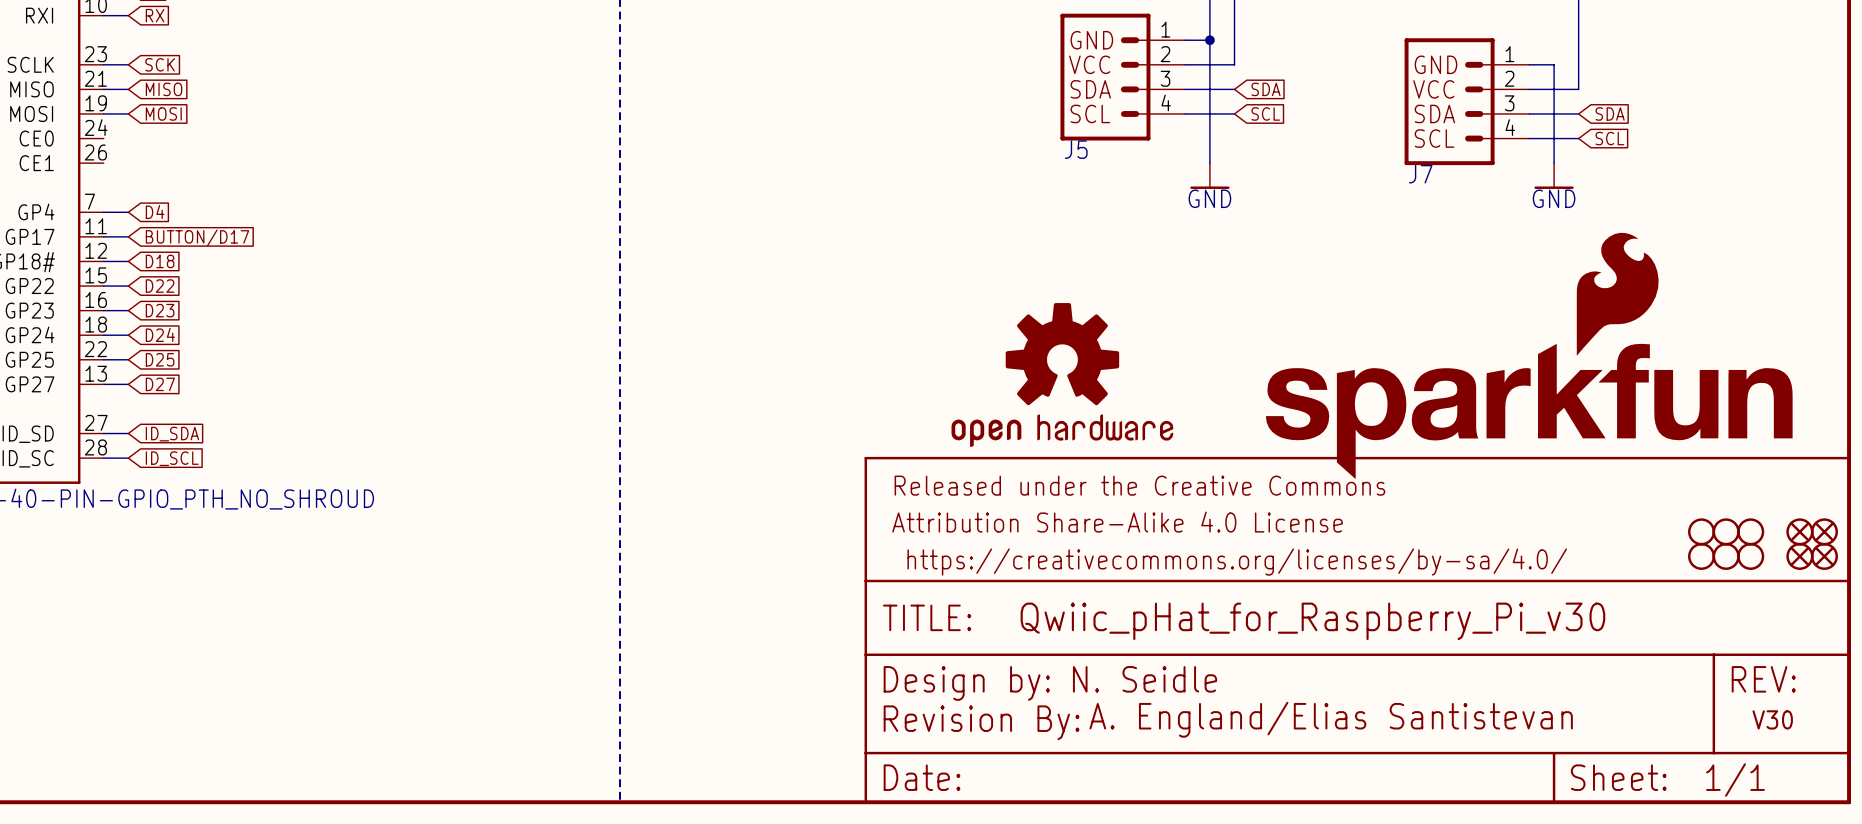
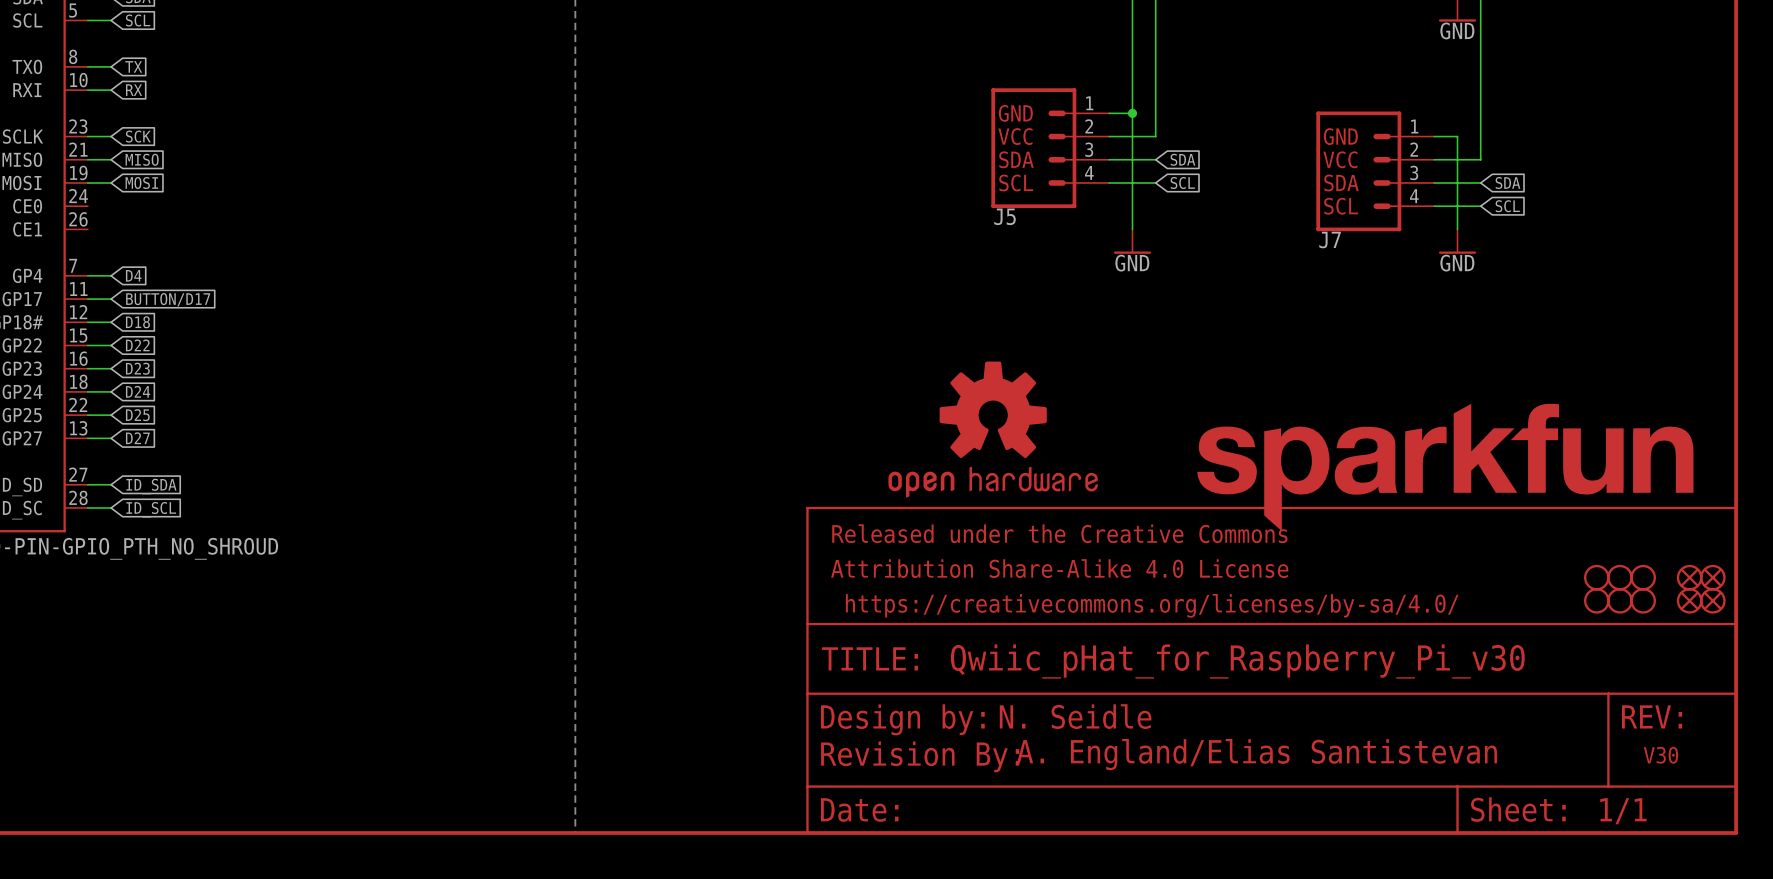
part: (1529, 355) -> none
part: none -> (1445, 467)

